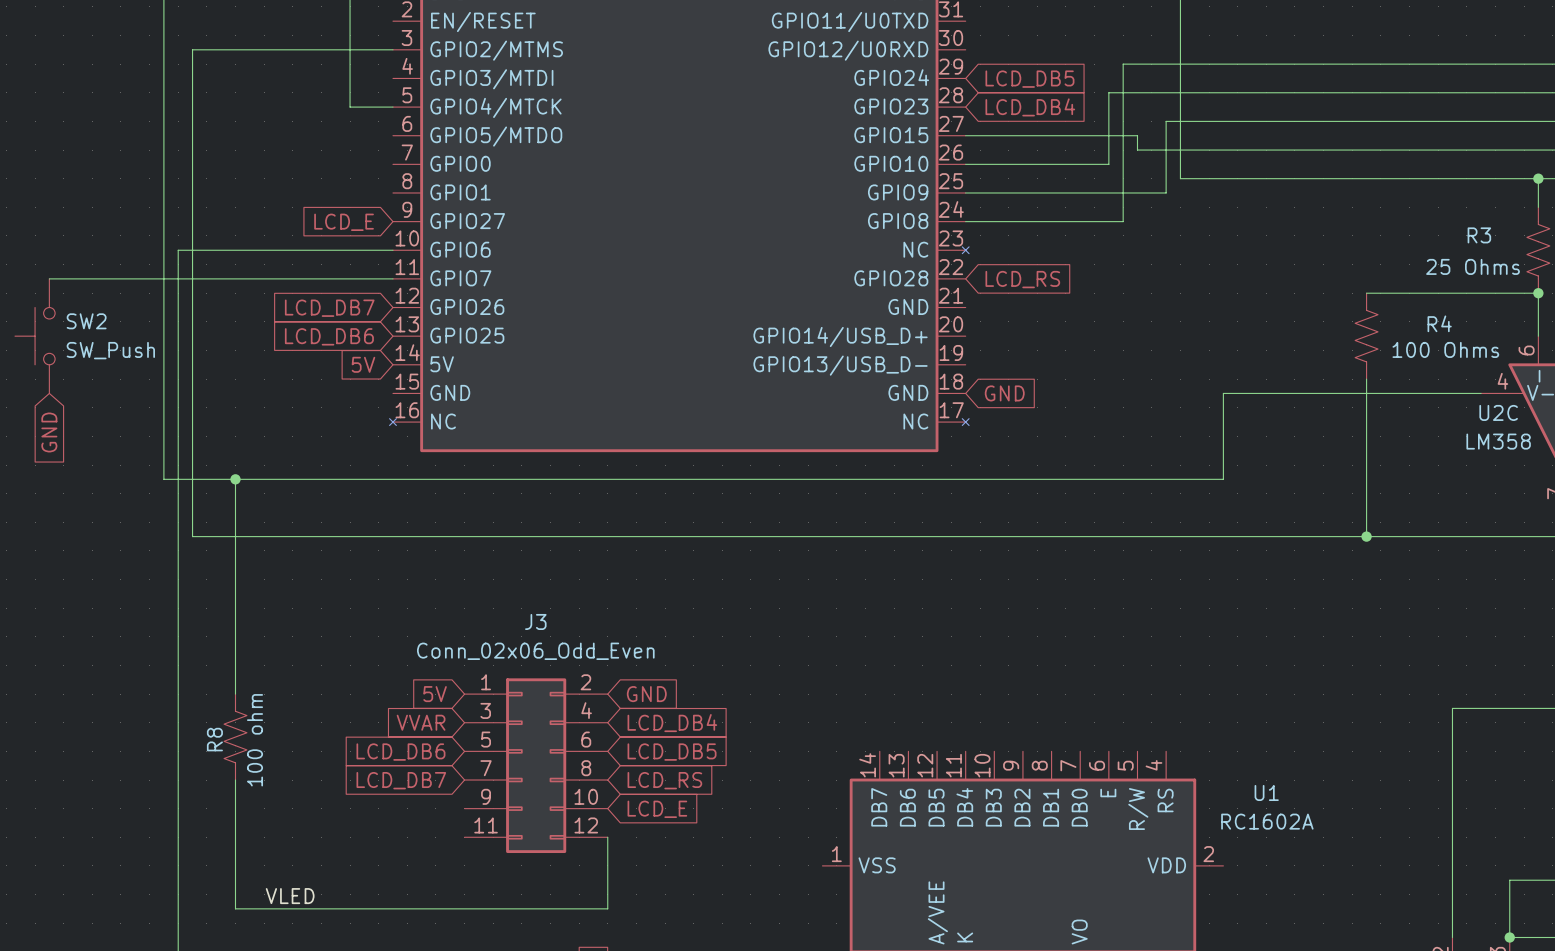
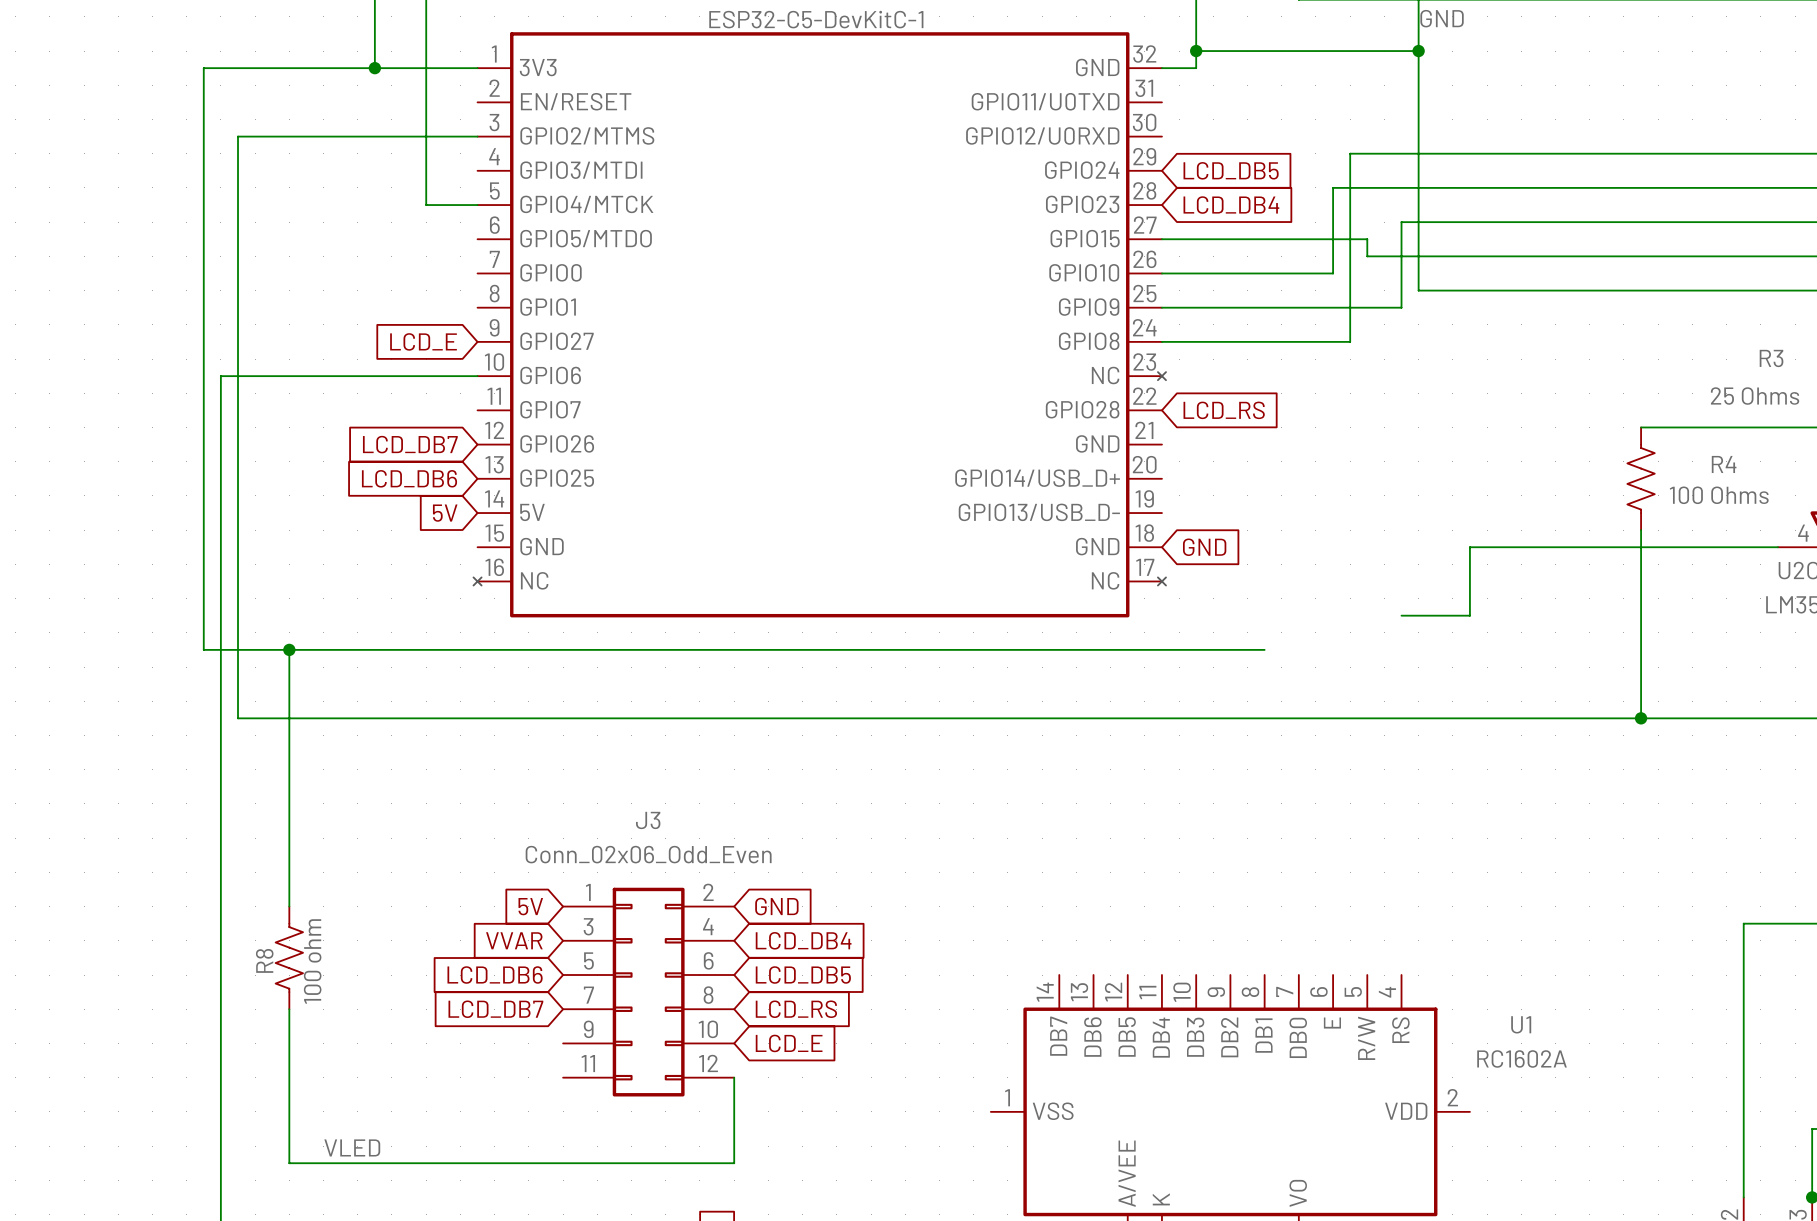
wire: (49, 278) (392, 278) -> none
SW2: SW_Push (35, 336) -> none
global label: GND (49, 432) -> none
wire: (1223, 450) (1223, 479) (1051, 479) -> (1469, 615) (1401, 615)

